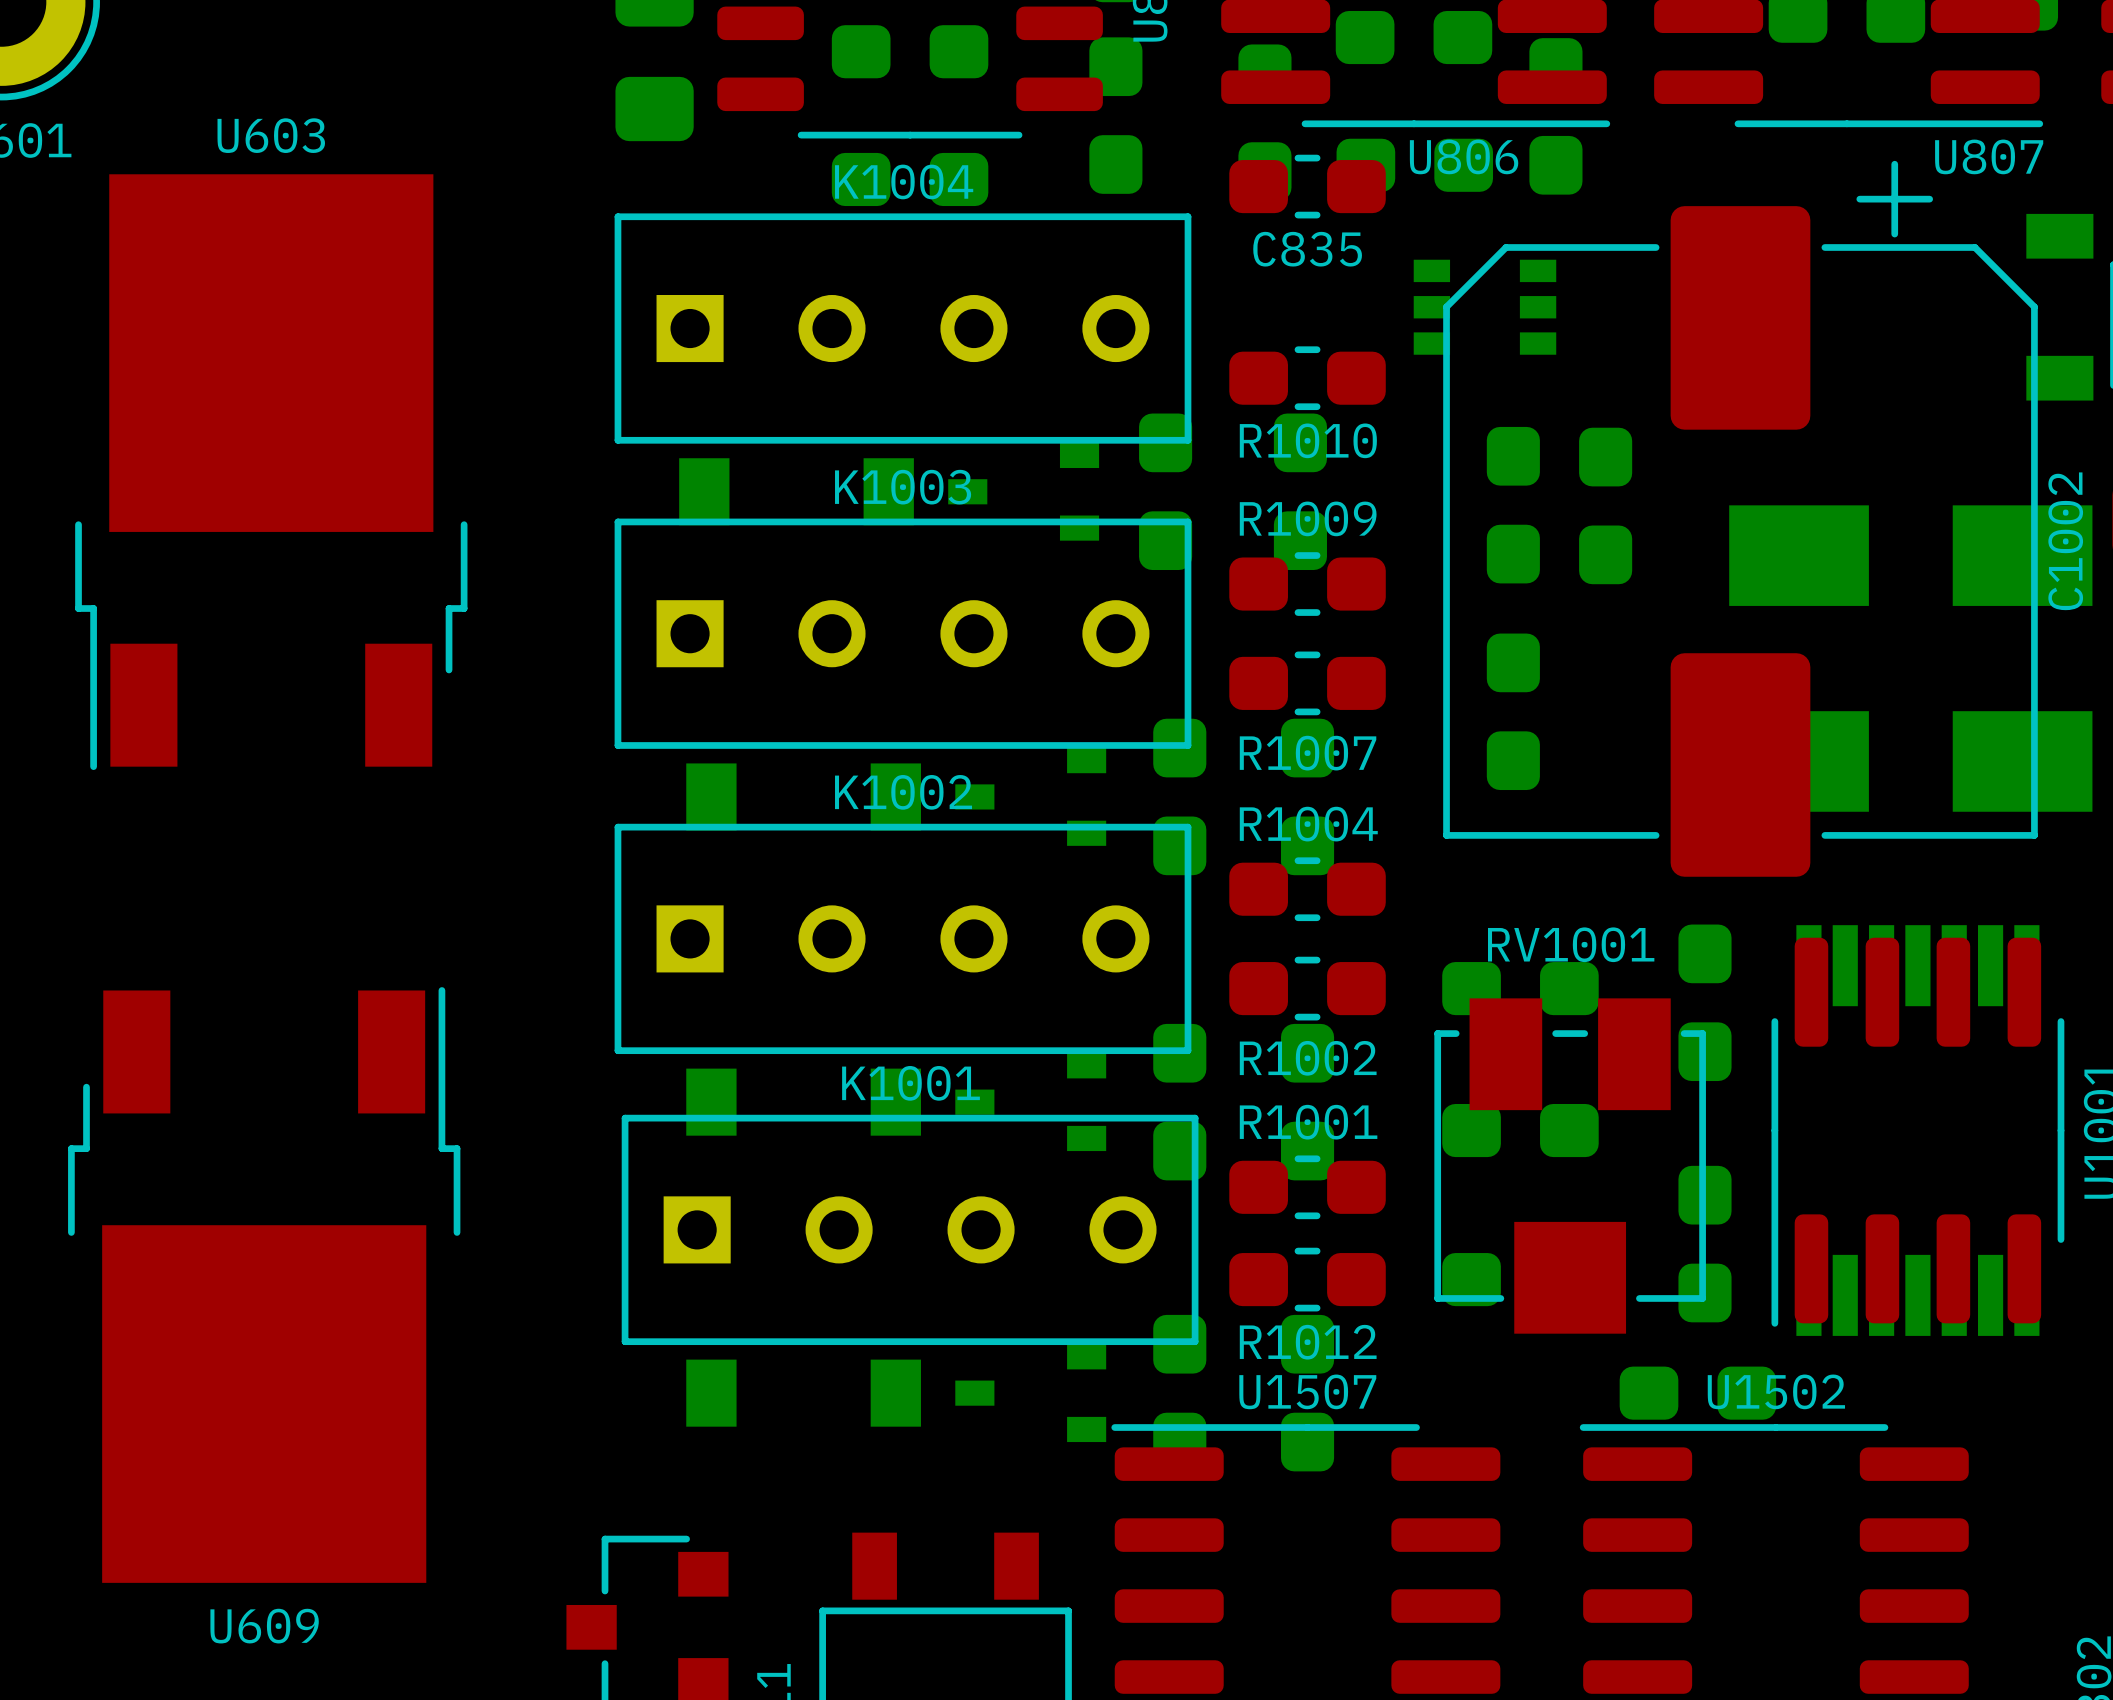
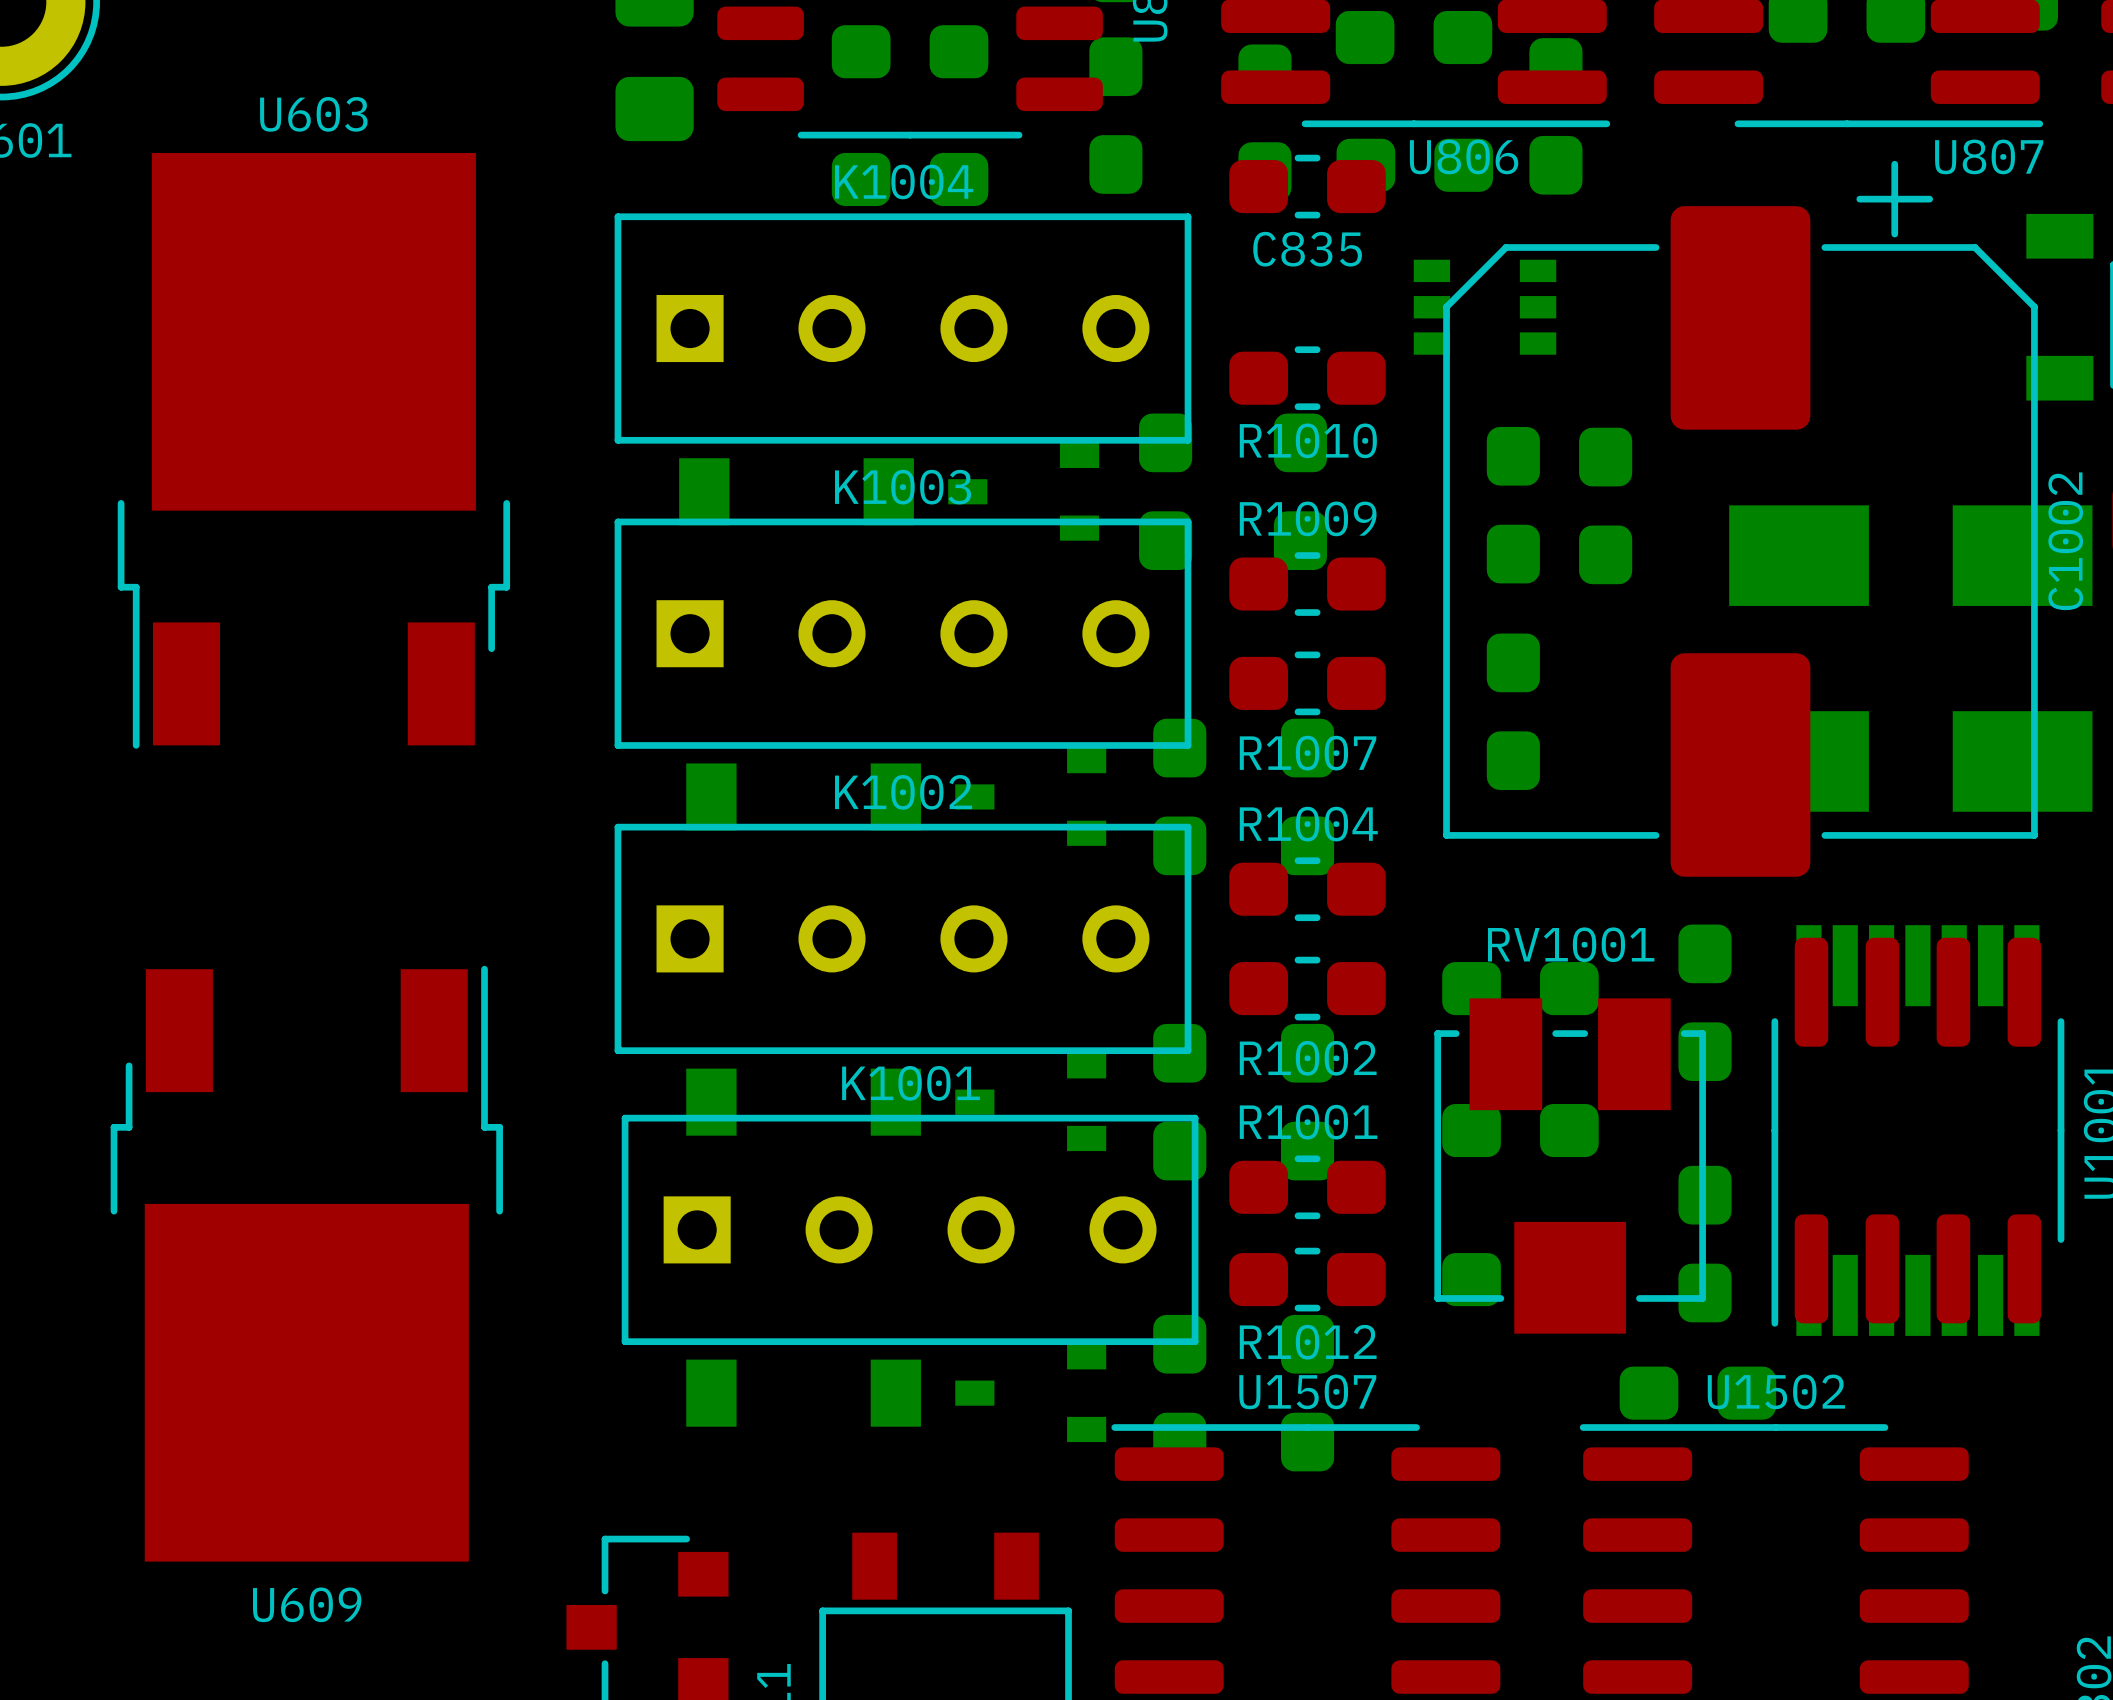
U603 position: (271, 472) -> (313, 450)
U609 position: (264, 1285) -> (306, 1263)

